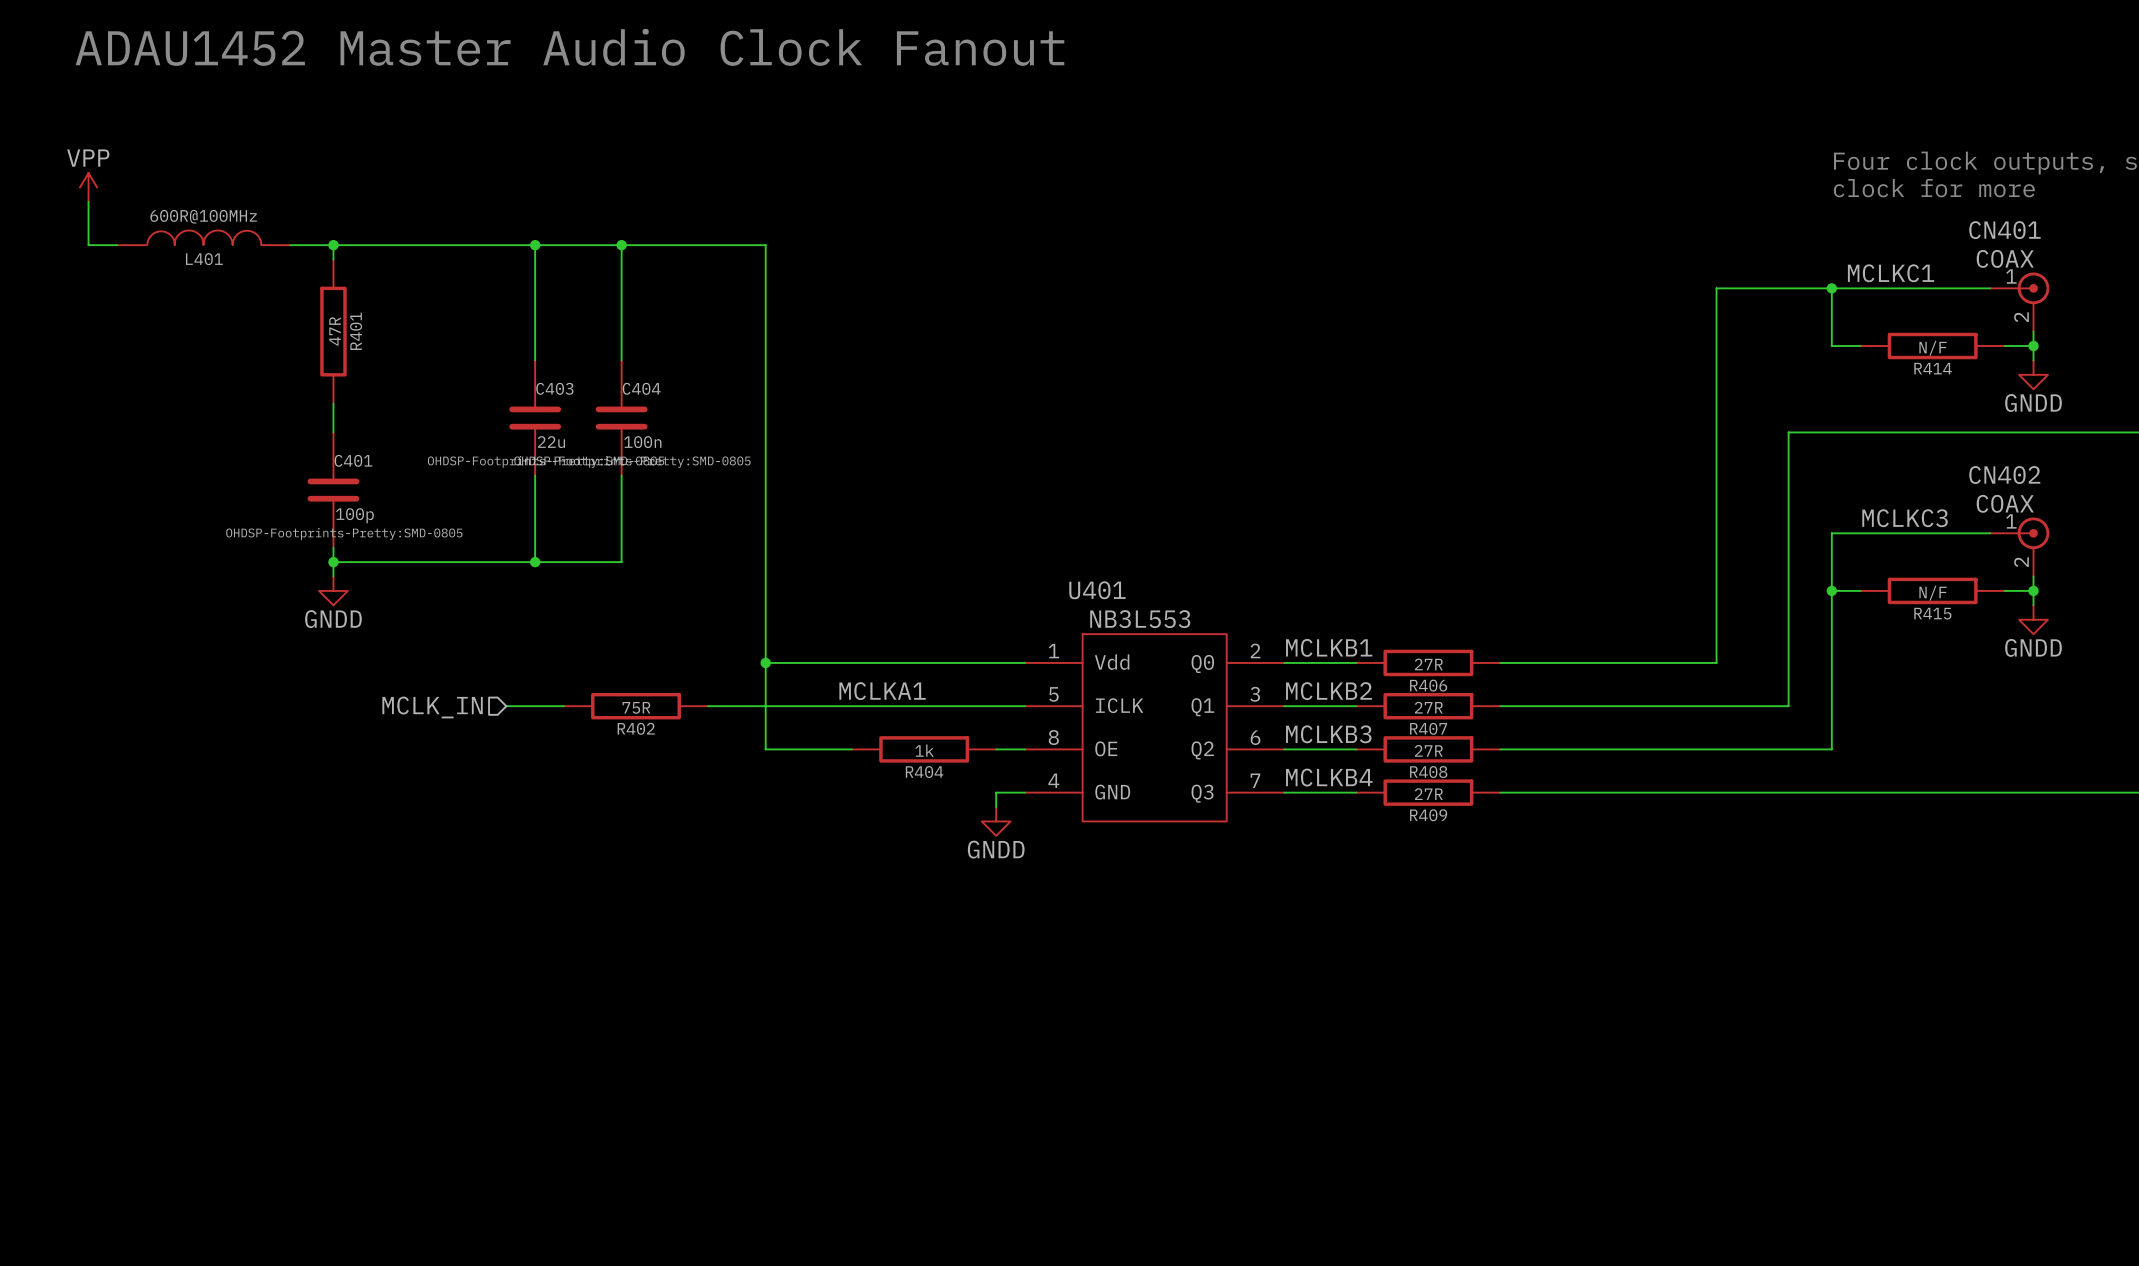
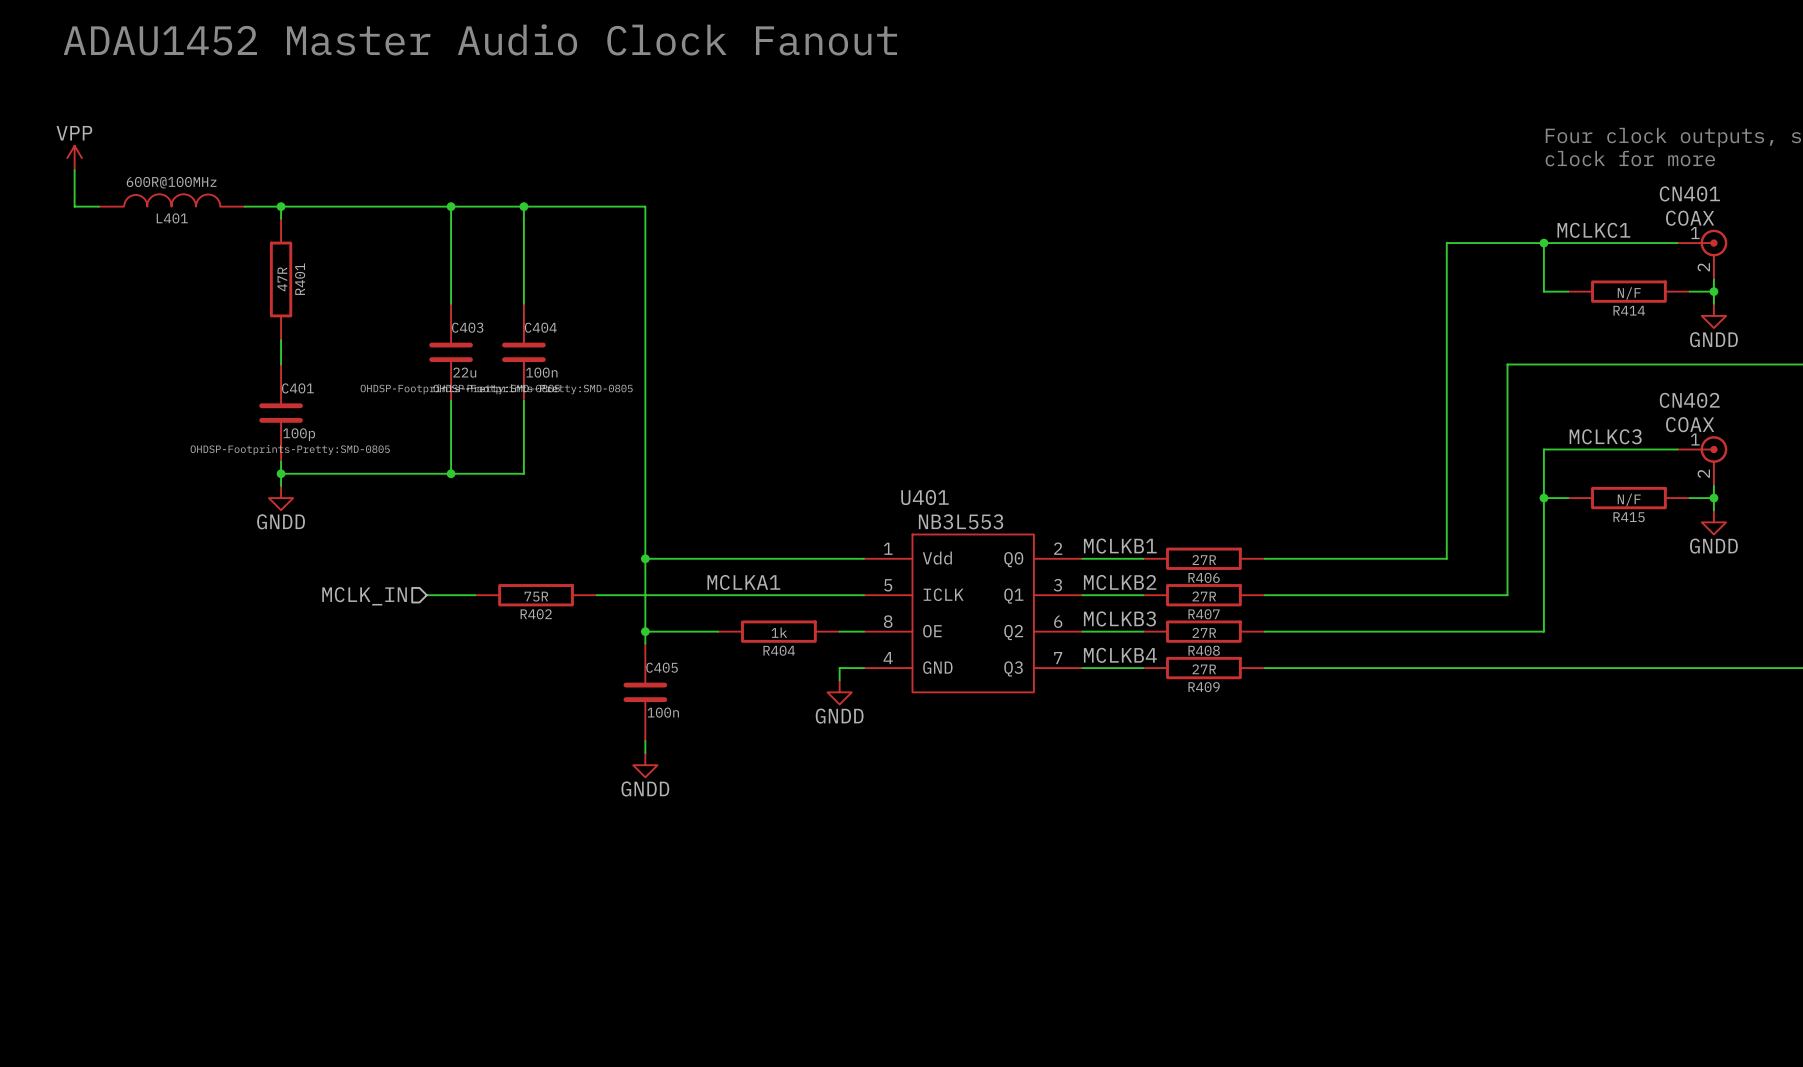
wire: none -> (645, 631) (645, 643)
junction: none -> (645, 631)
C405: none -> 100n (645, 692)
wire: none -> (645, 740) (645, 753)
power symbol: none -> GNDD (645, 765)

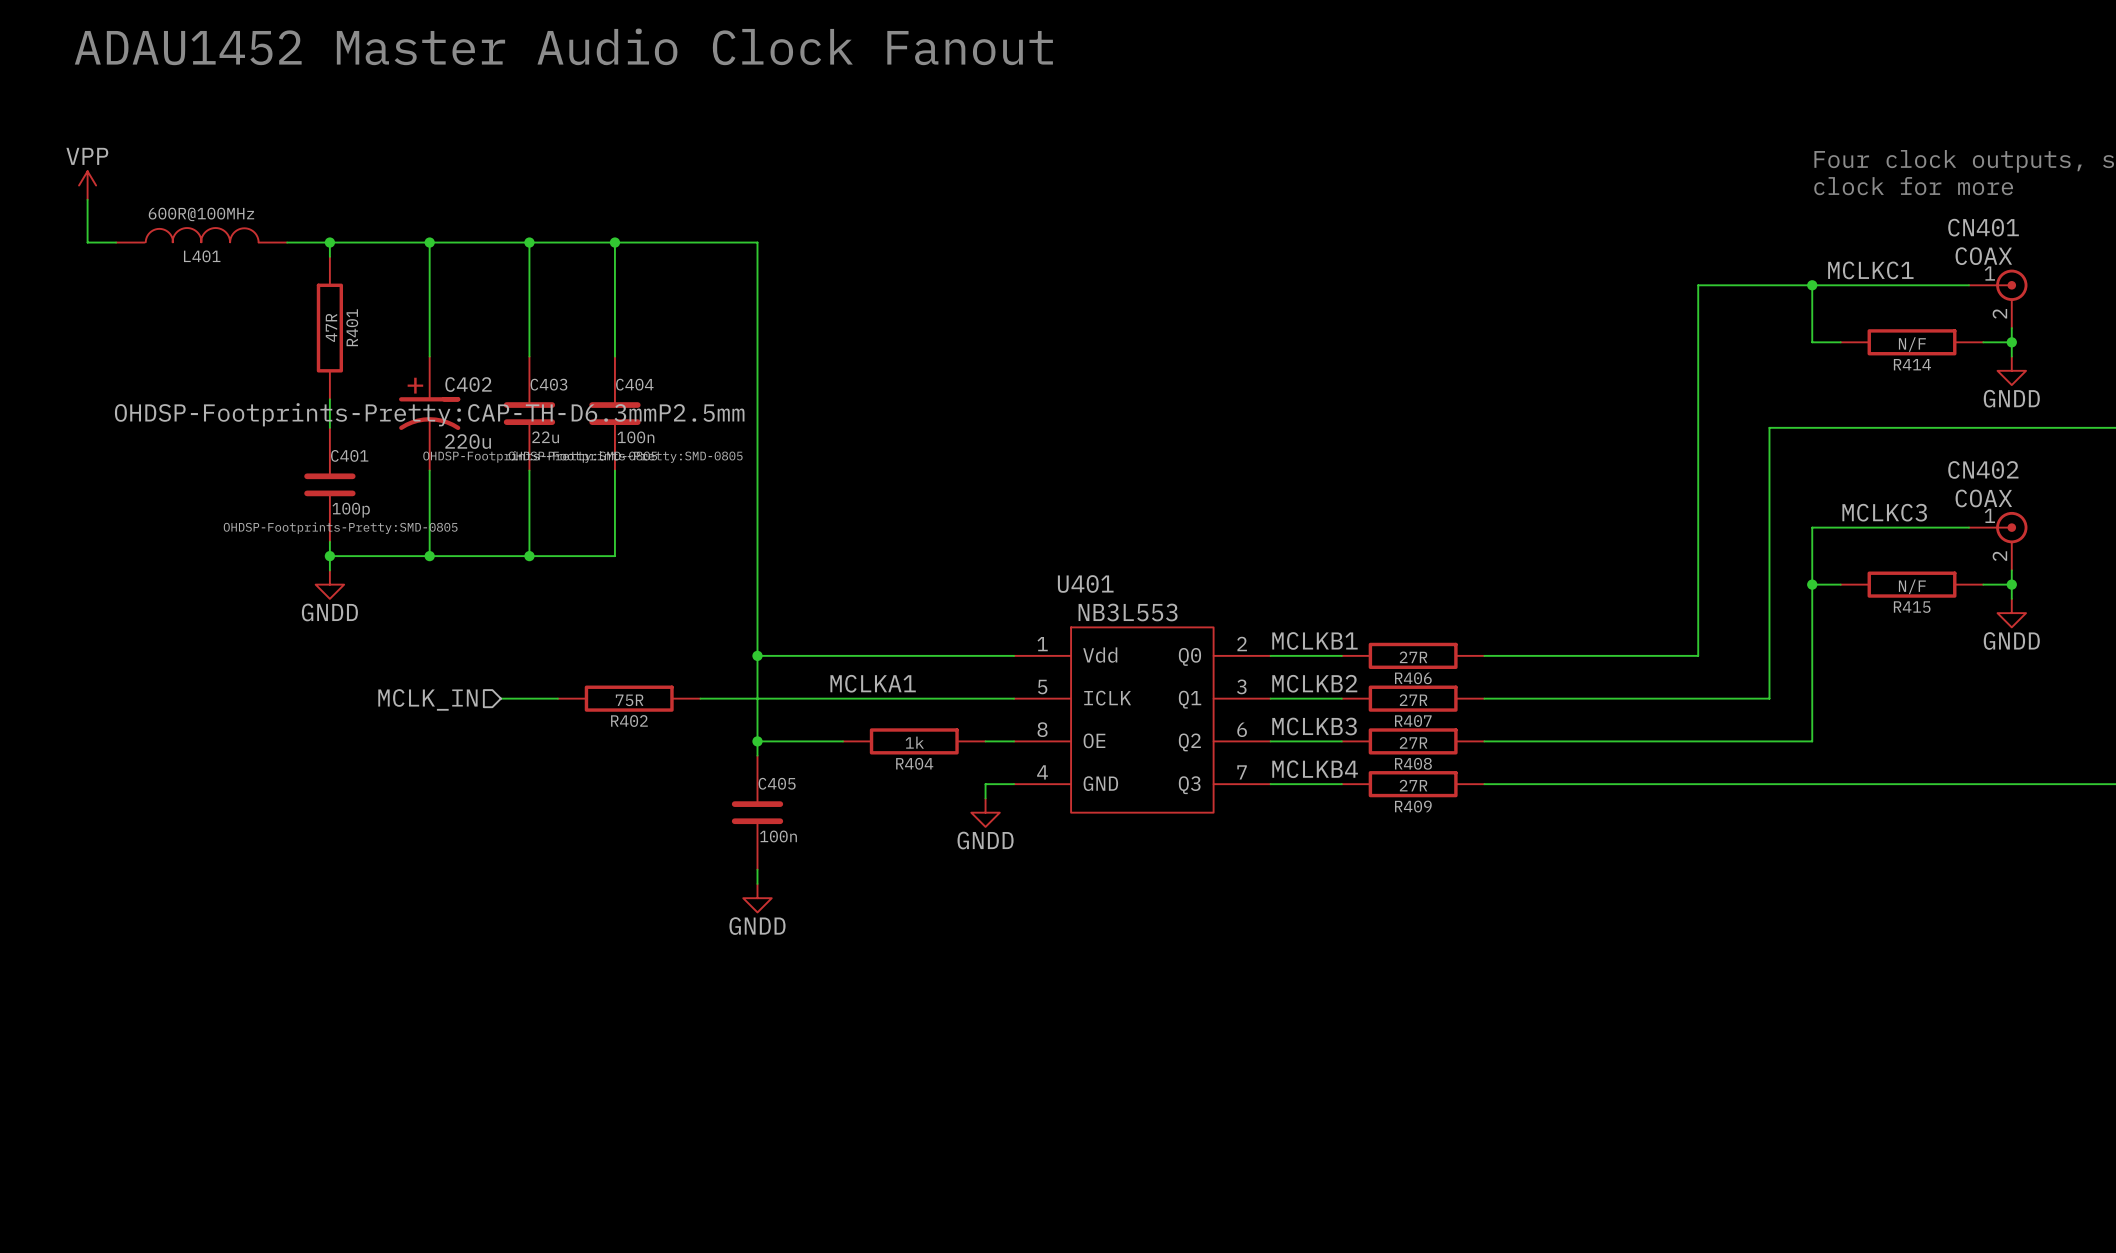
wire: none -> (429, 242) (429, 356)
junction: none -> (429, 242)
C402: none -> 220u (429, 413)
wire: none -> (429, 470) (429, 556)
junction: none -> (429, 556)

